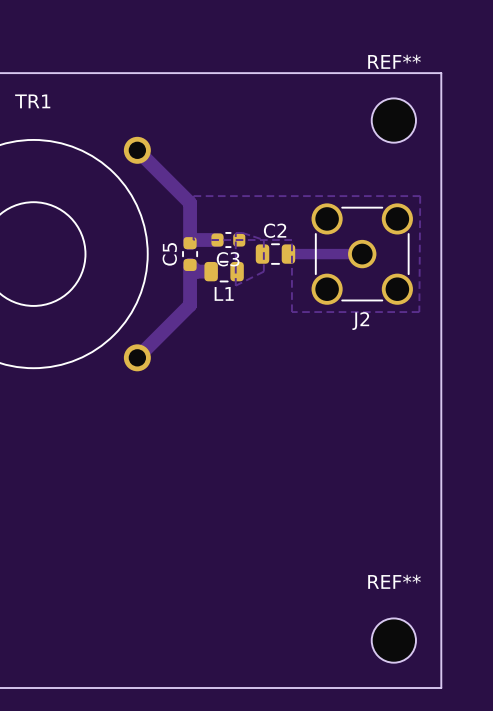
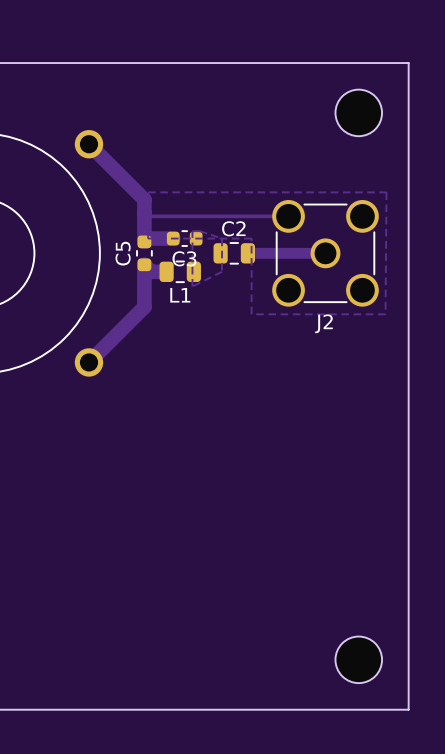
REF** name: REF** (394, 61) -> none
track: none -> (144, 212) (148, 216) (288, 216)
REF** name: REF** (394, 581) -> none

